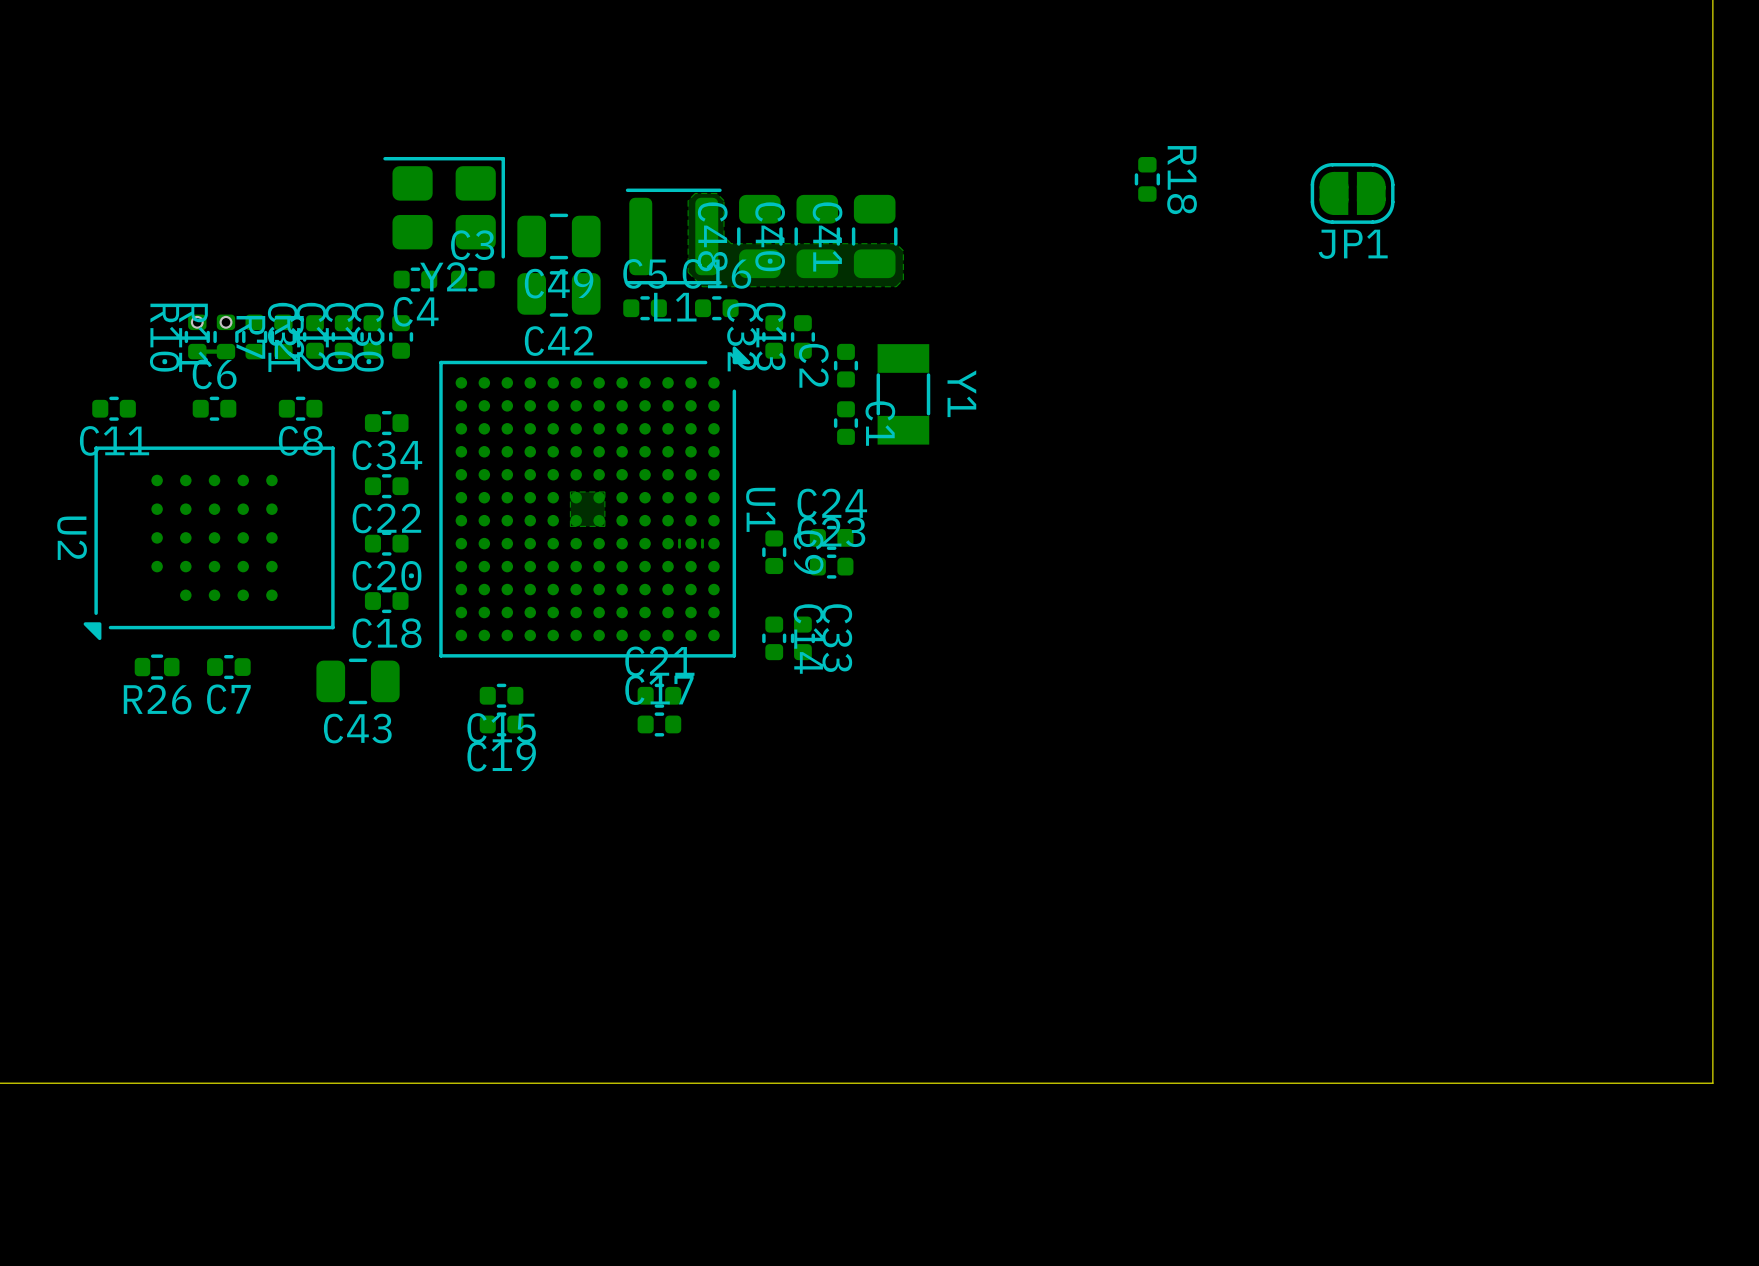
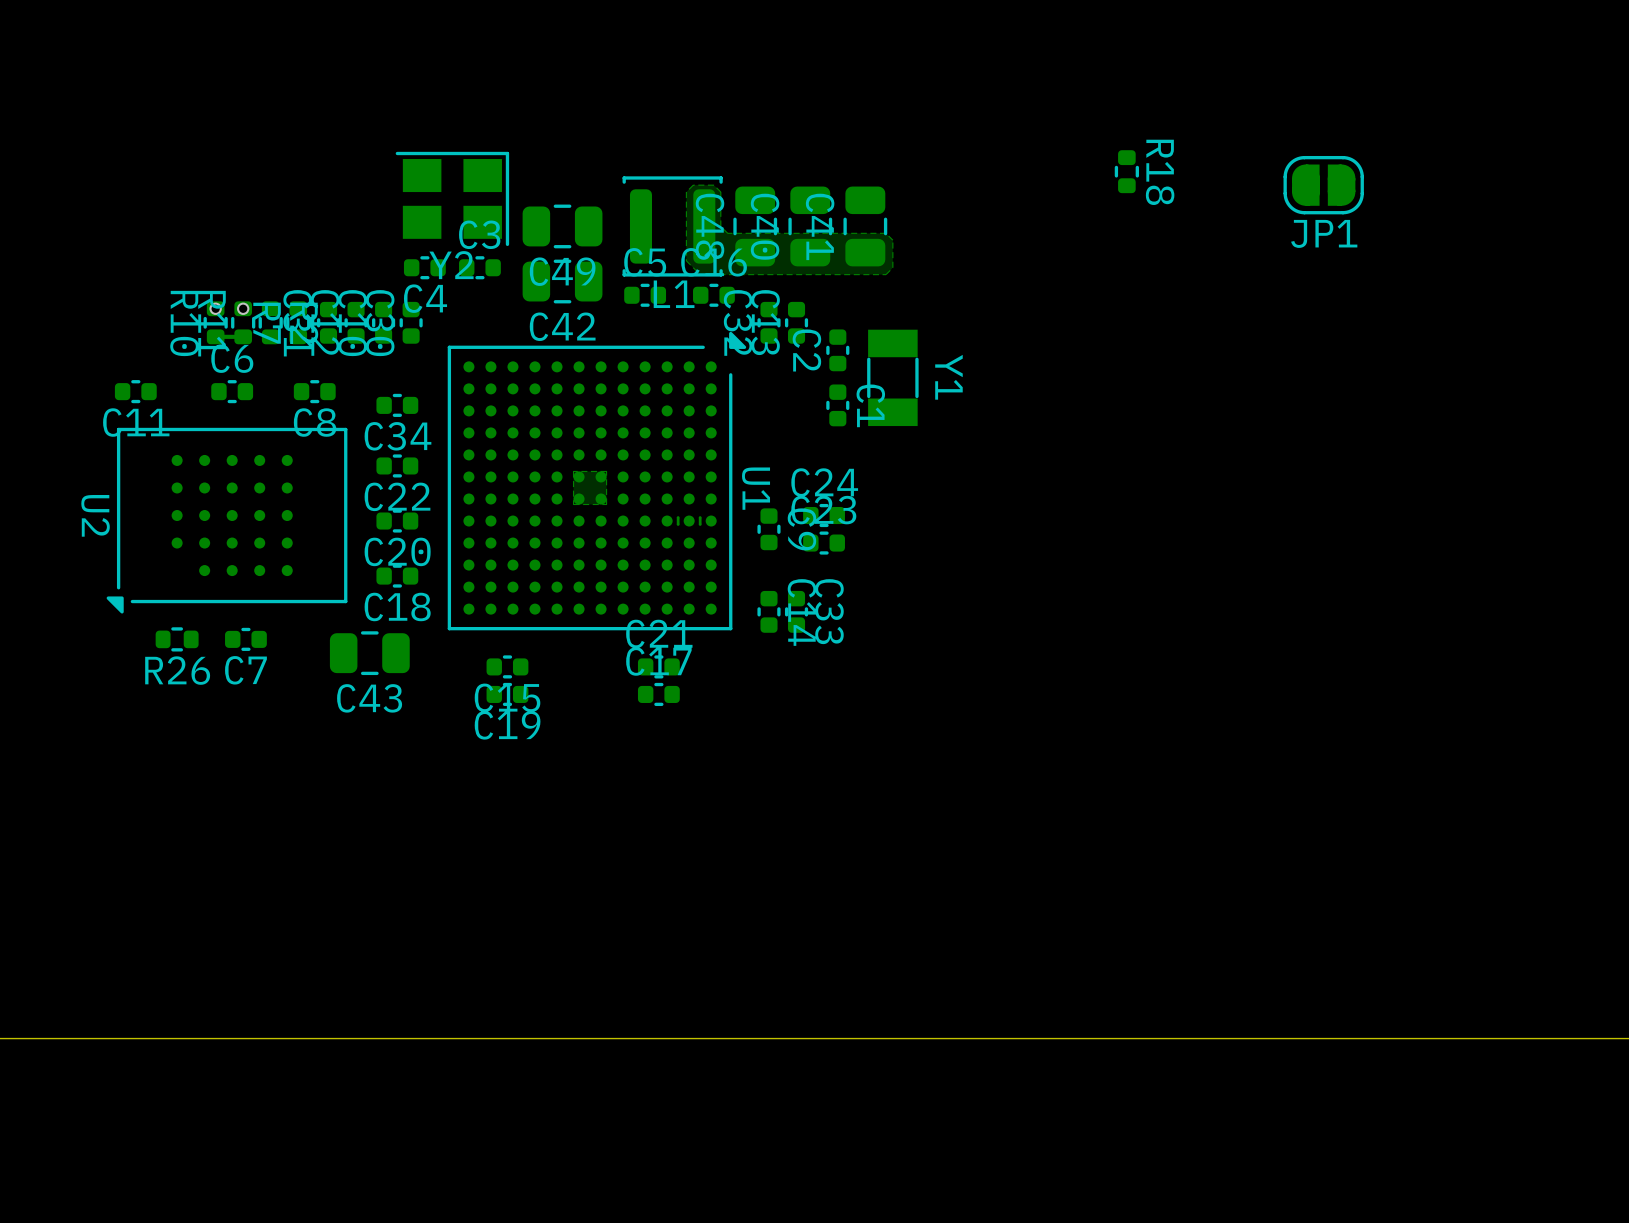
Y2 footprint: [383, 156, 505, 259] -> [395, 151, 510, 247]
L1 footprint: [625, 188, 722, 285] -> [622, 176, 723, 277]

